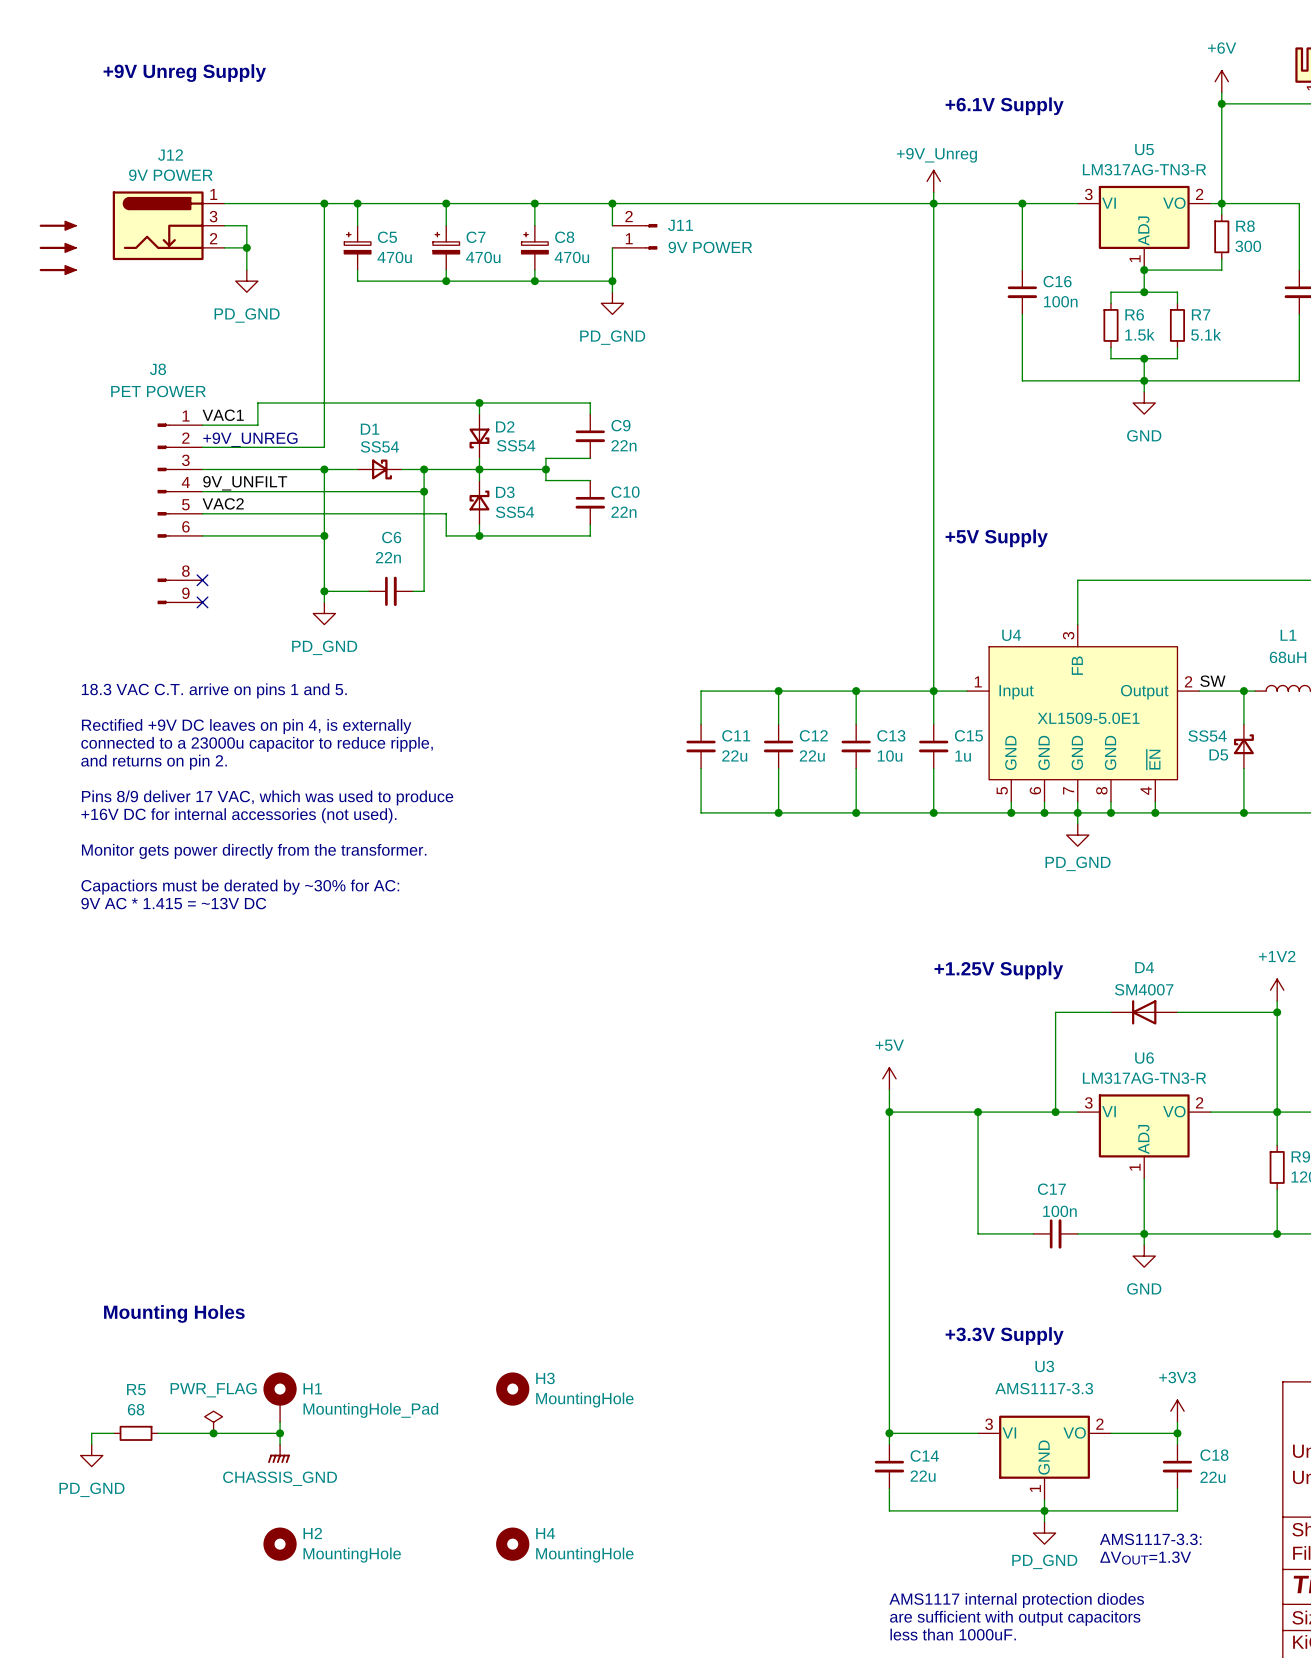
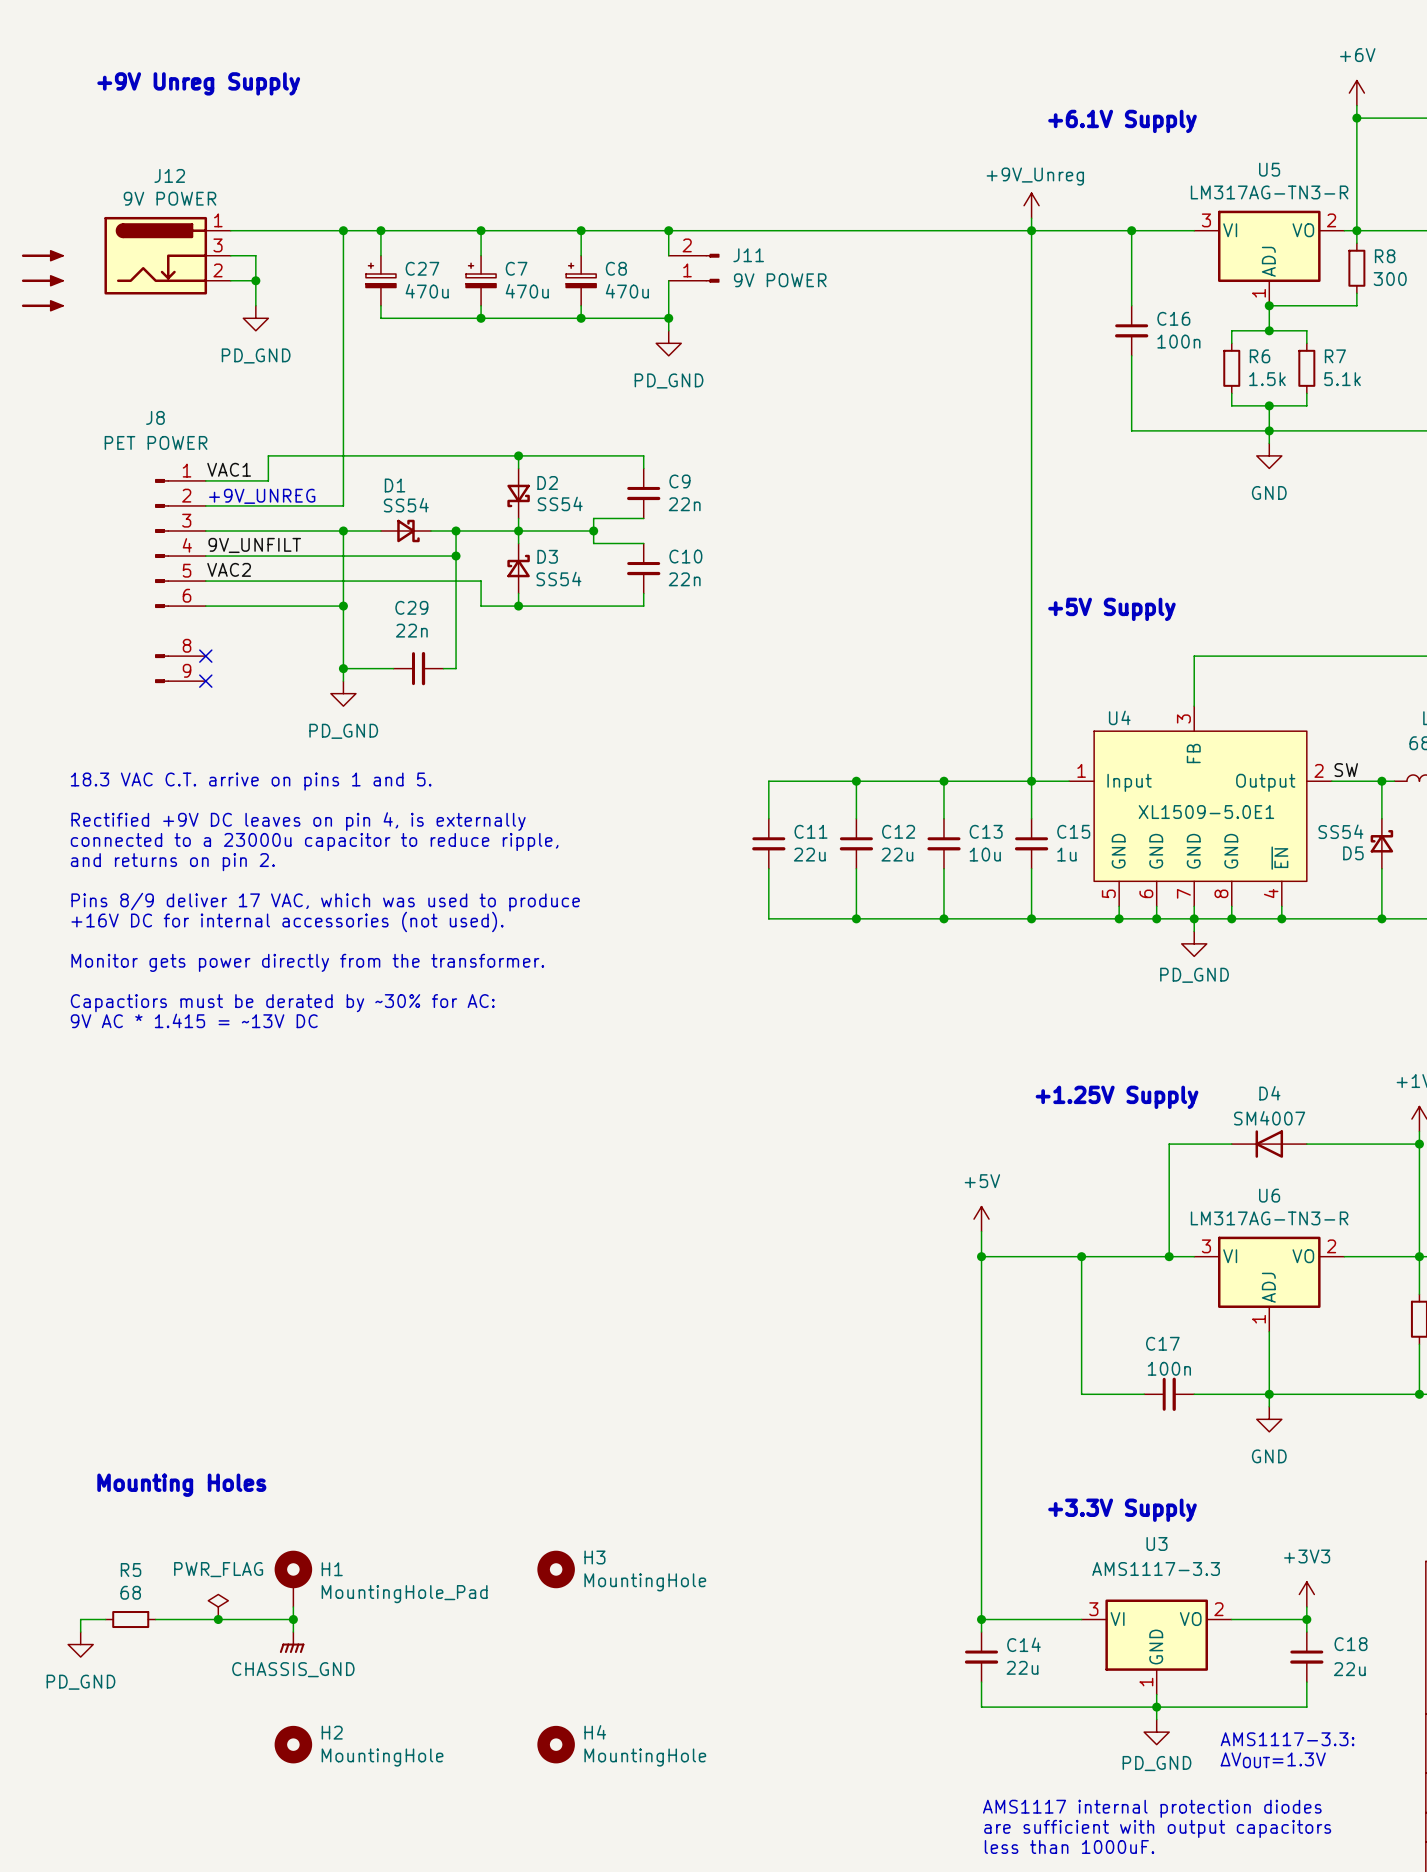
C5 name: C5 (387, 237) -> C27 (422, 268)
C6 name: C6 (391, 537) -> C29 (411, 607)

